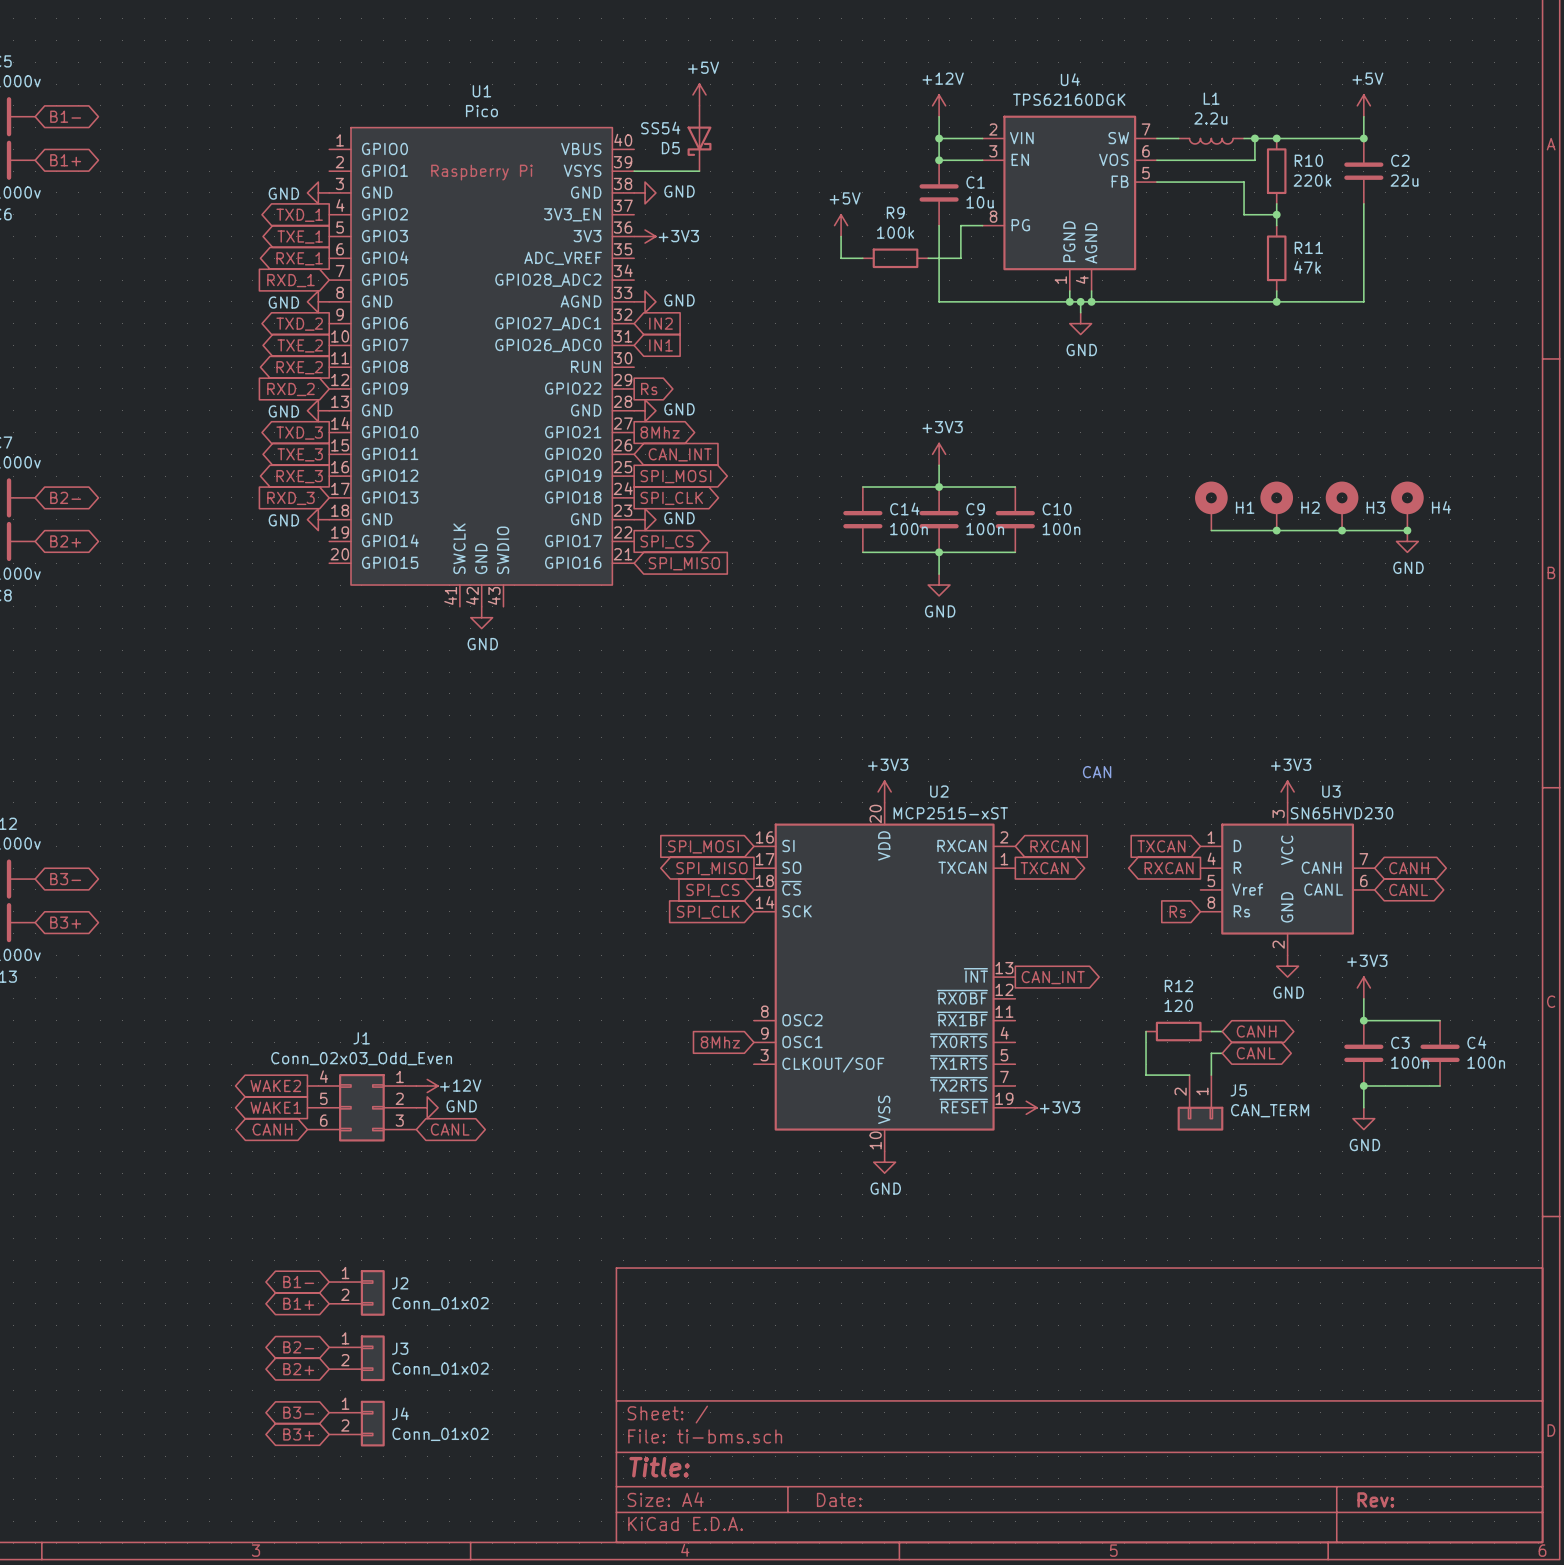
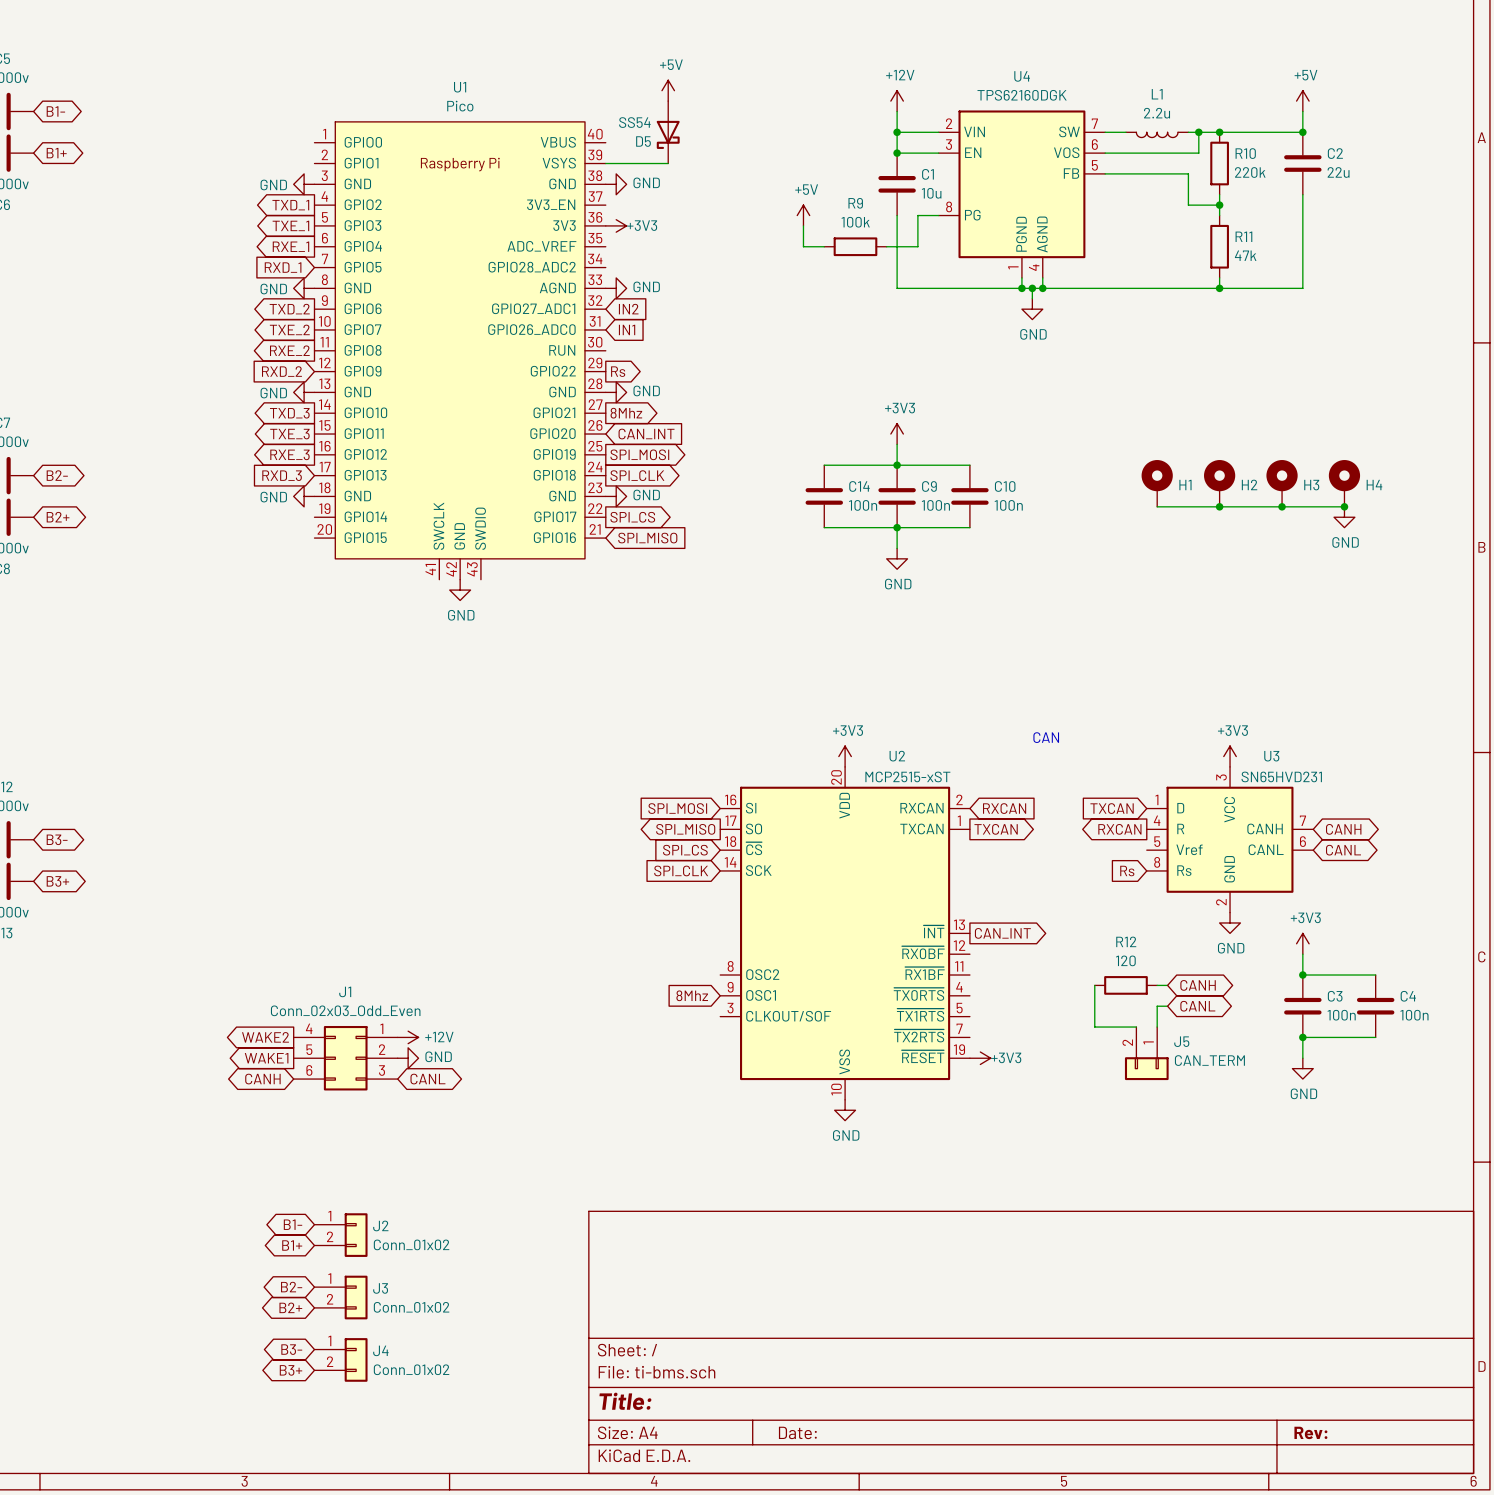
U3 value: SN65HVD230 (1342, 813) -> SN65HVD231 (1281, 776)

